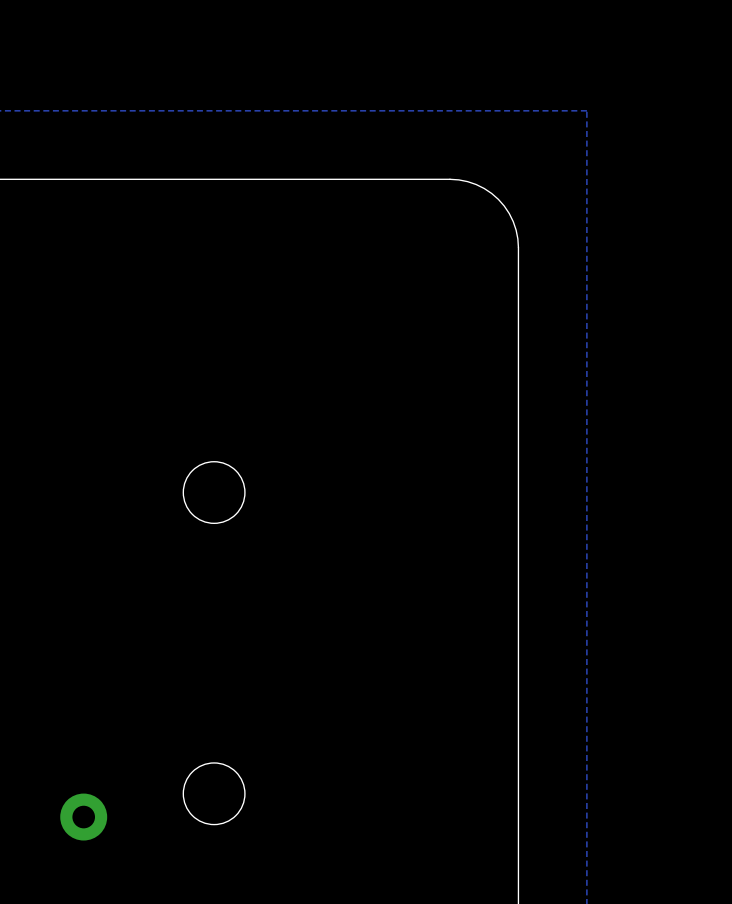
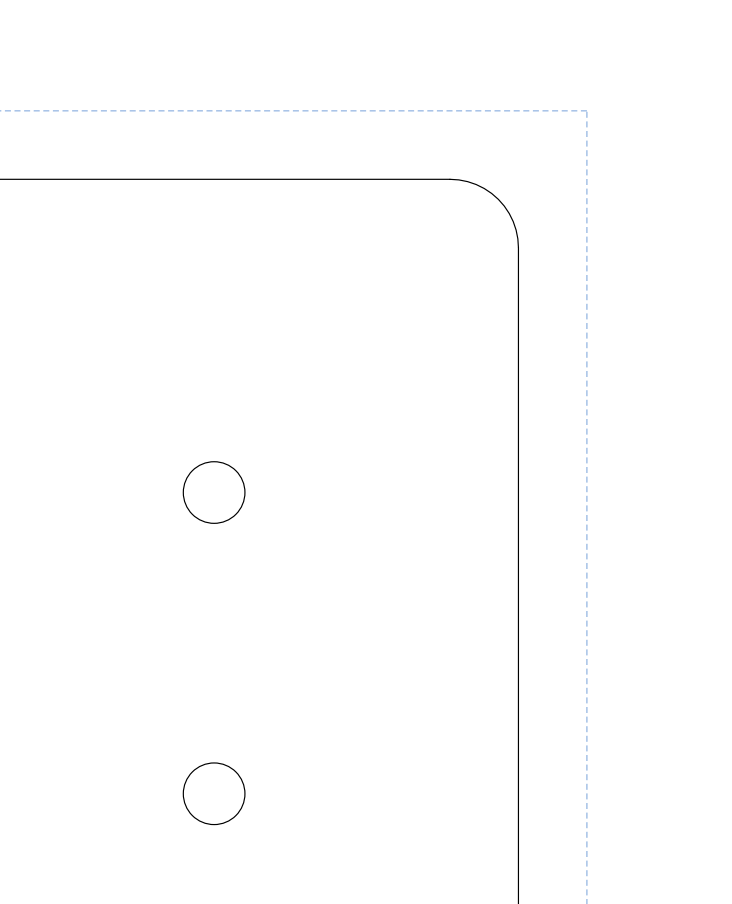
via: (83, 817) -> none

